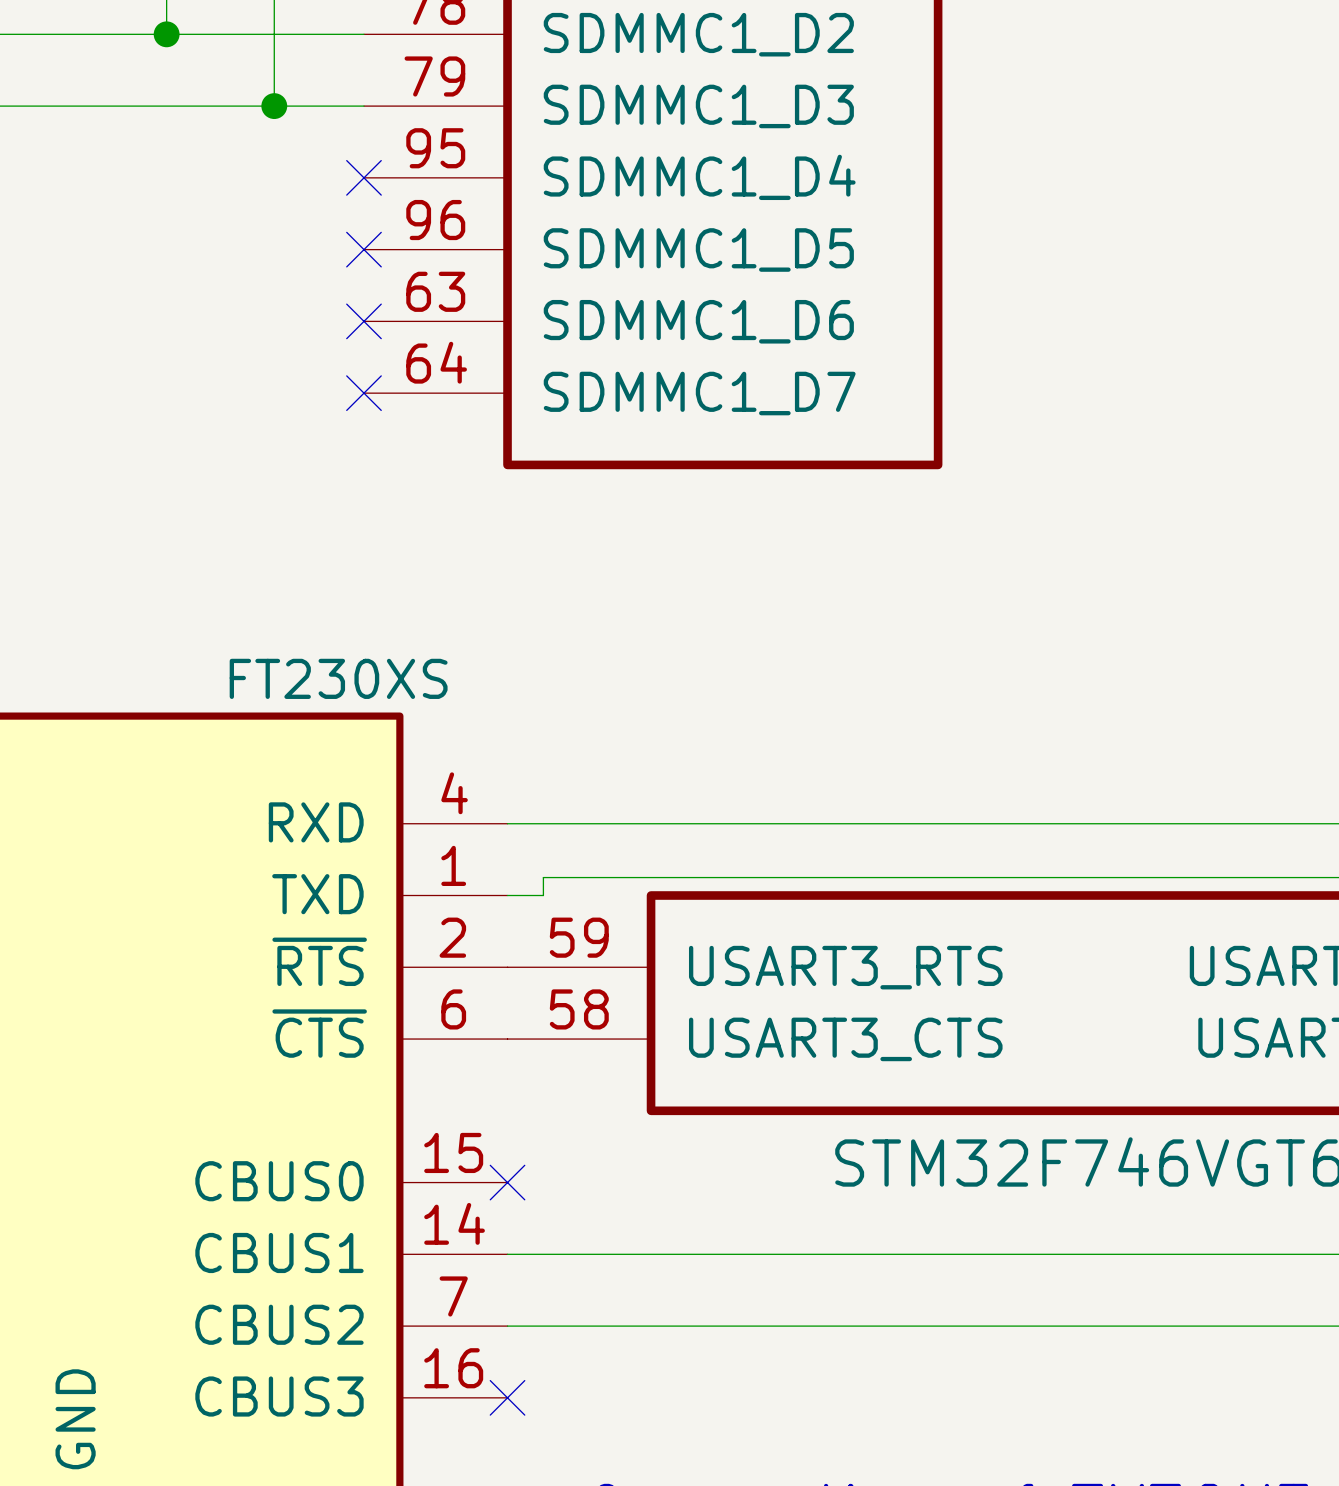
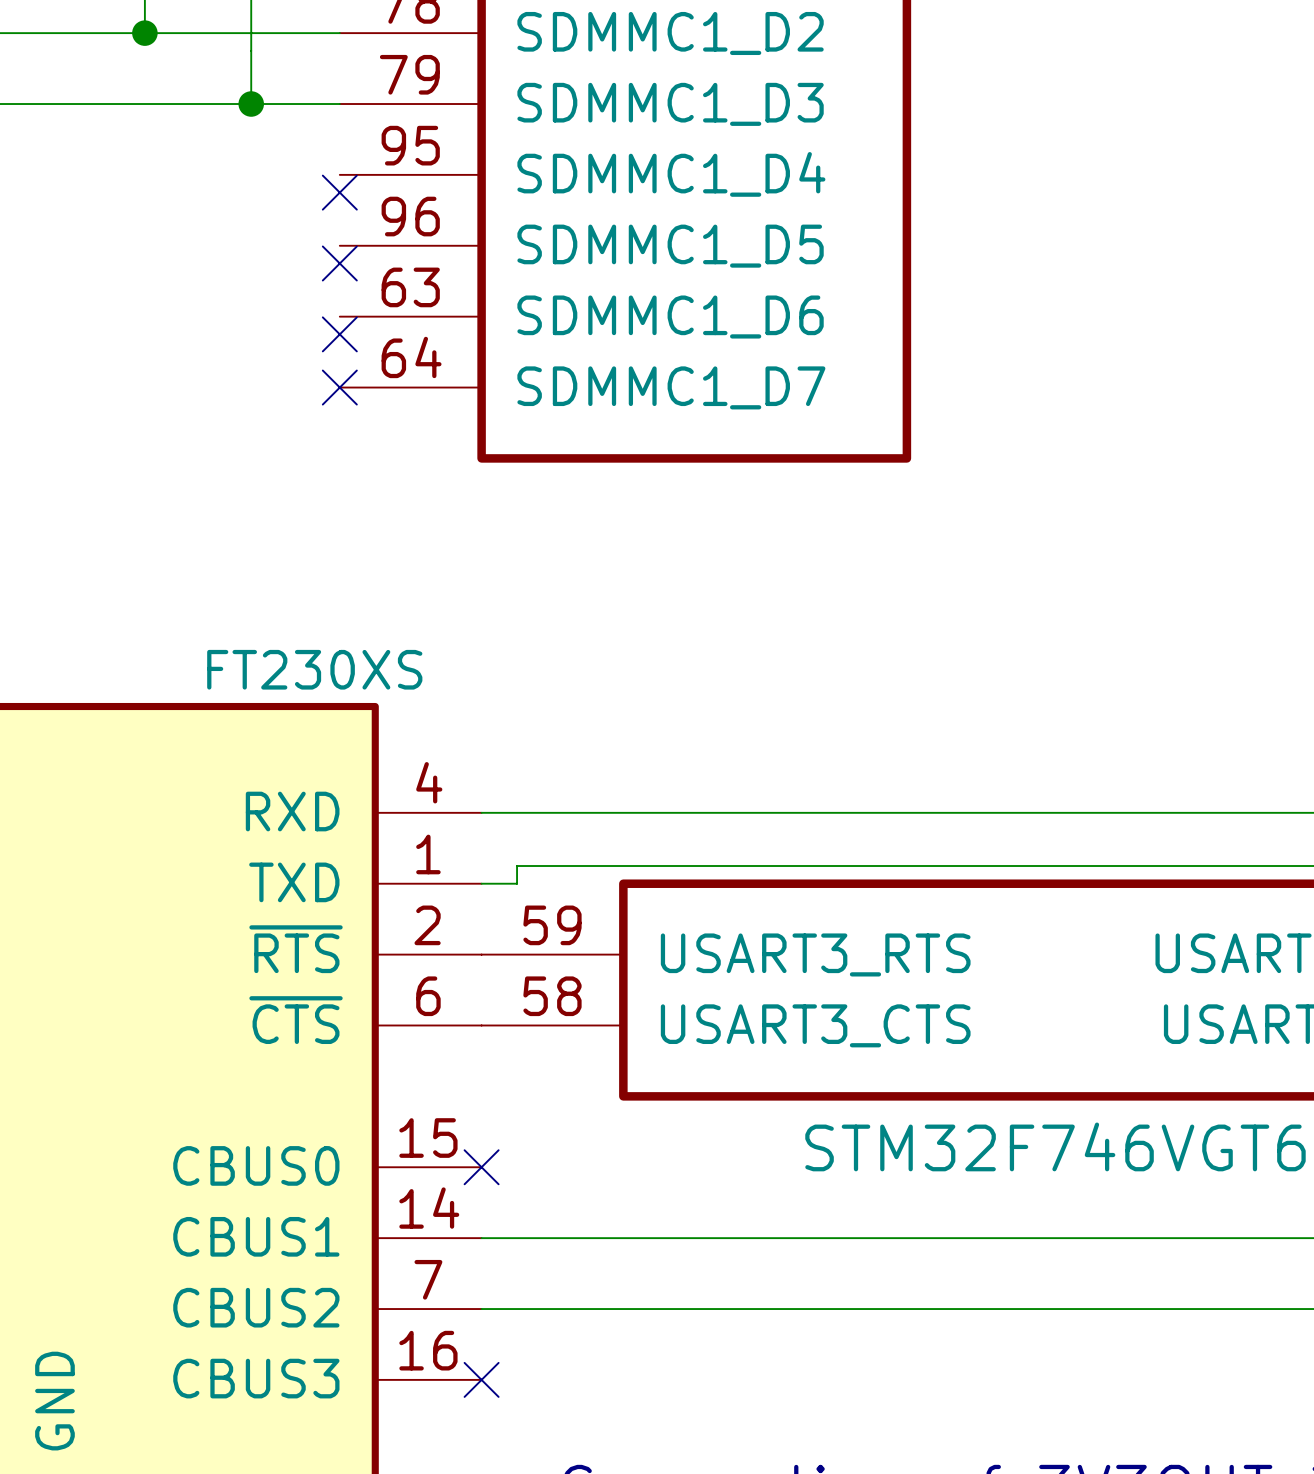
no-connect mark position: (363, 177) -> (339, 192)
no-connect mark position: (363, 249) -> (339, 263)
no-connect mark position: (363, 321) -> (339, 334)

